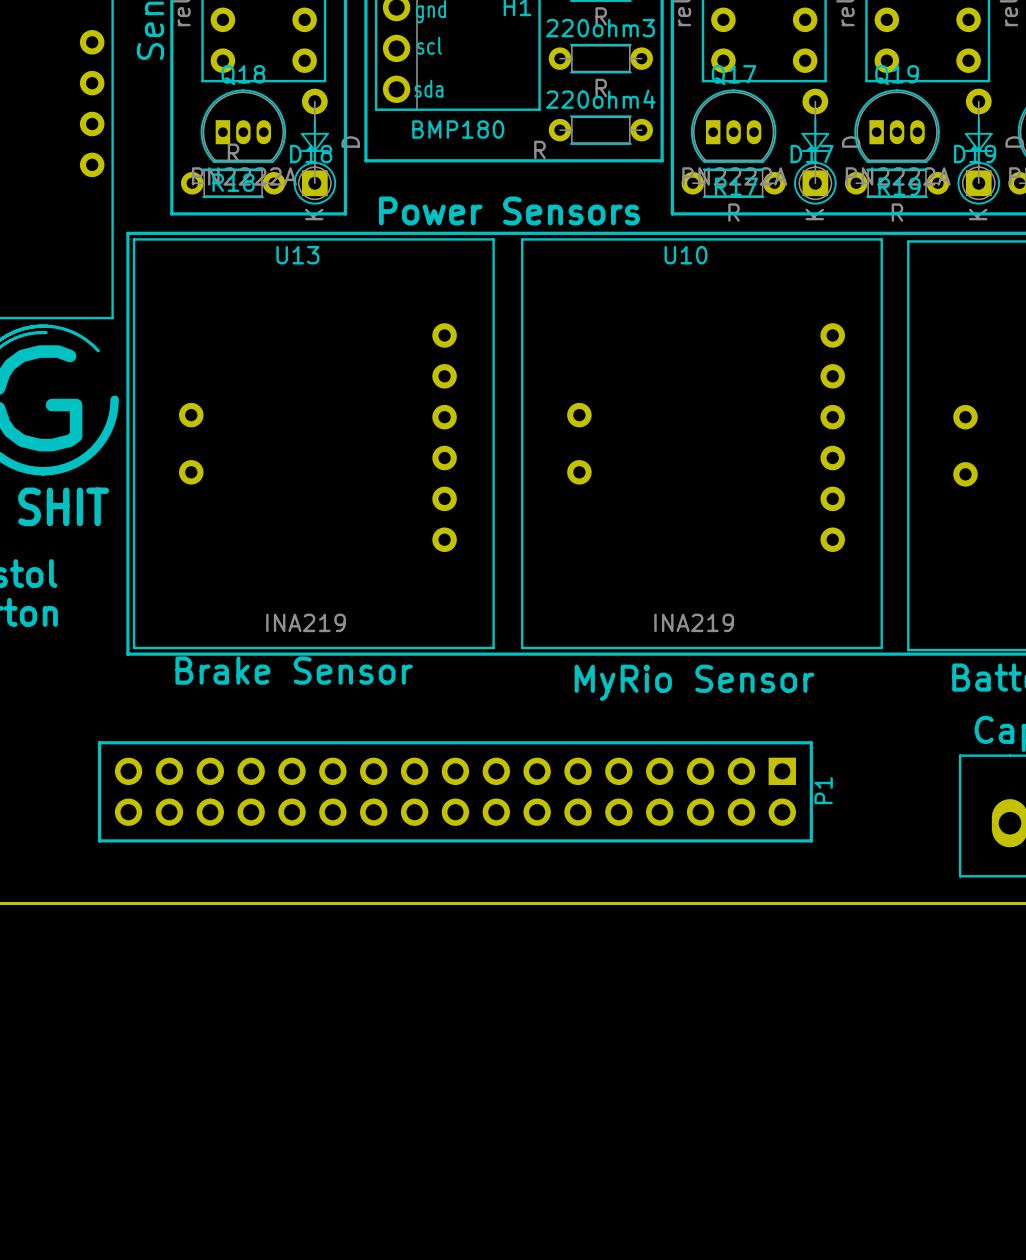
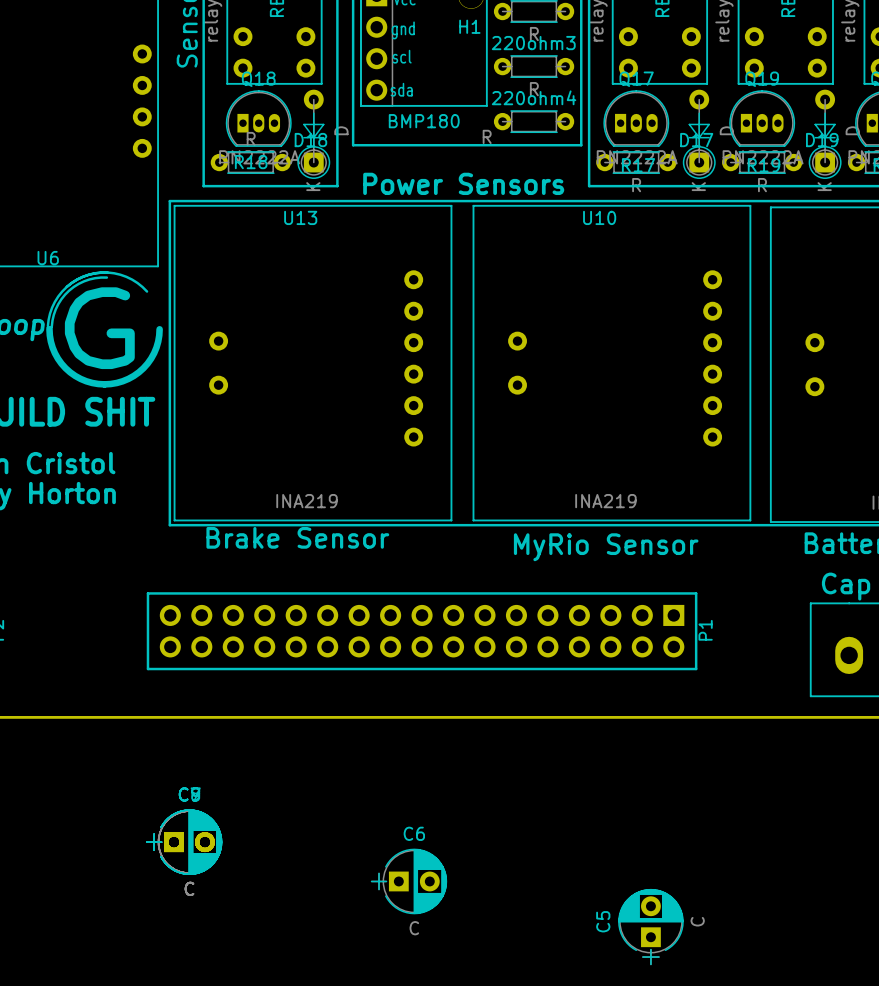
part: none -> C (184, 842)
part: none -> C (184, 842)
part: none -> C (184, 842)
C6: none -> C (409, 881)
C5: none -> C (650, 927)

